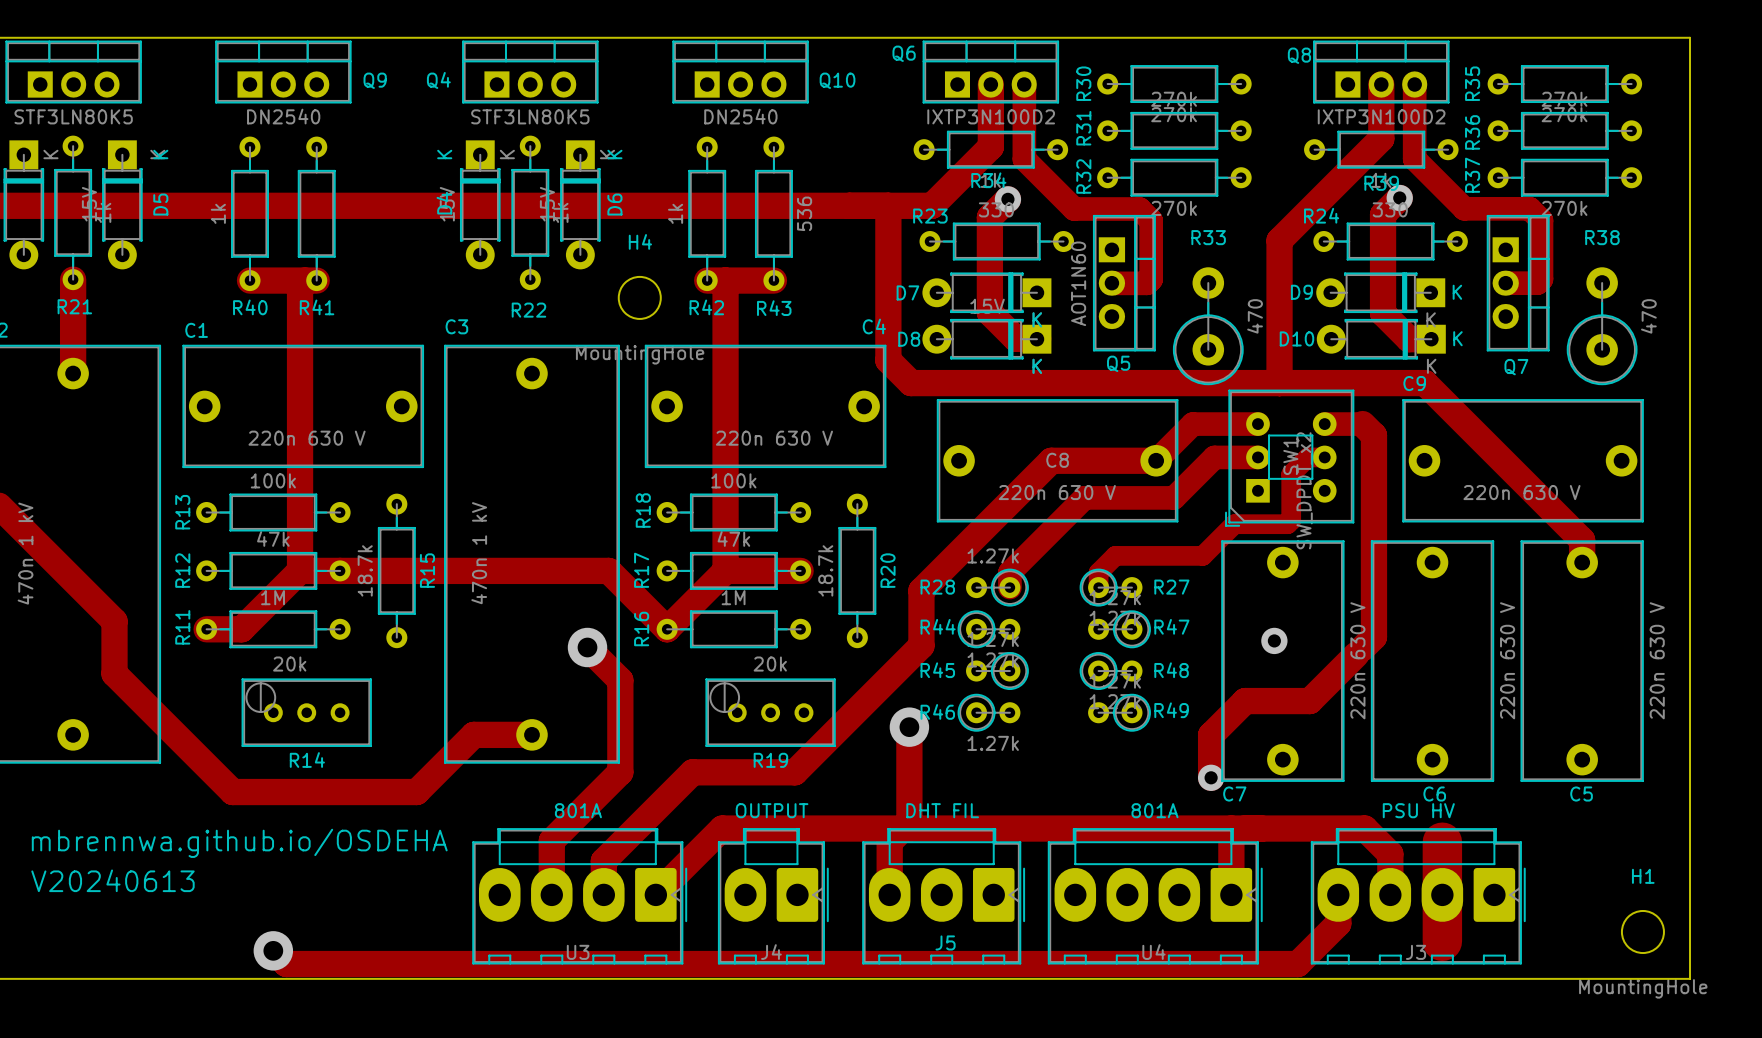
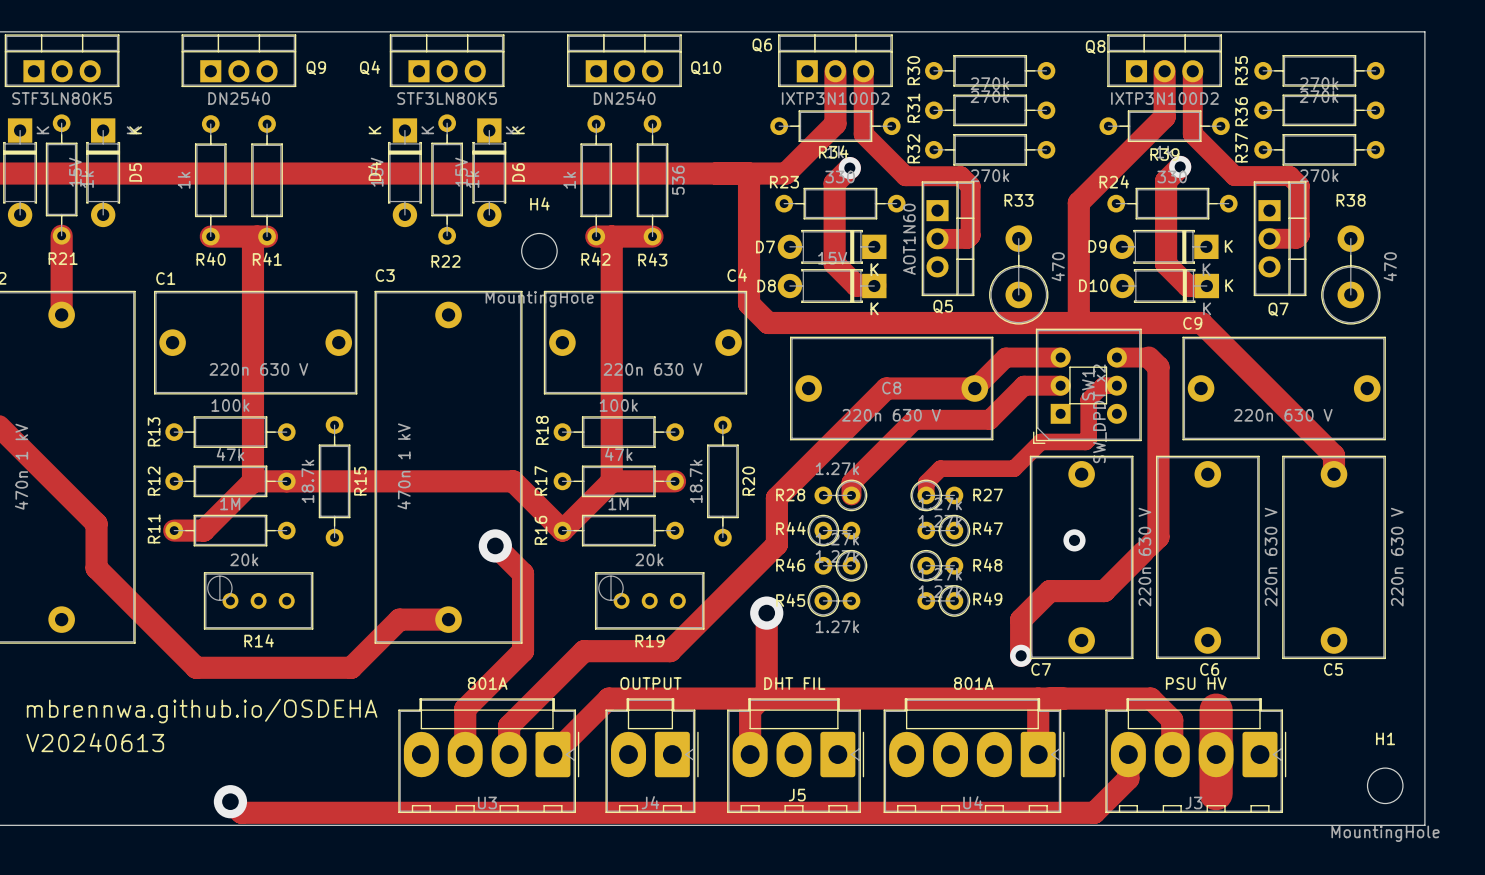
R45 name position: R45 (937, 670) -> R45 (790, 600)
R46 name position: R46 (937, 711) -> R46 (790, 565)

